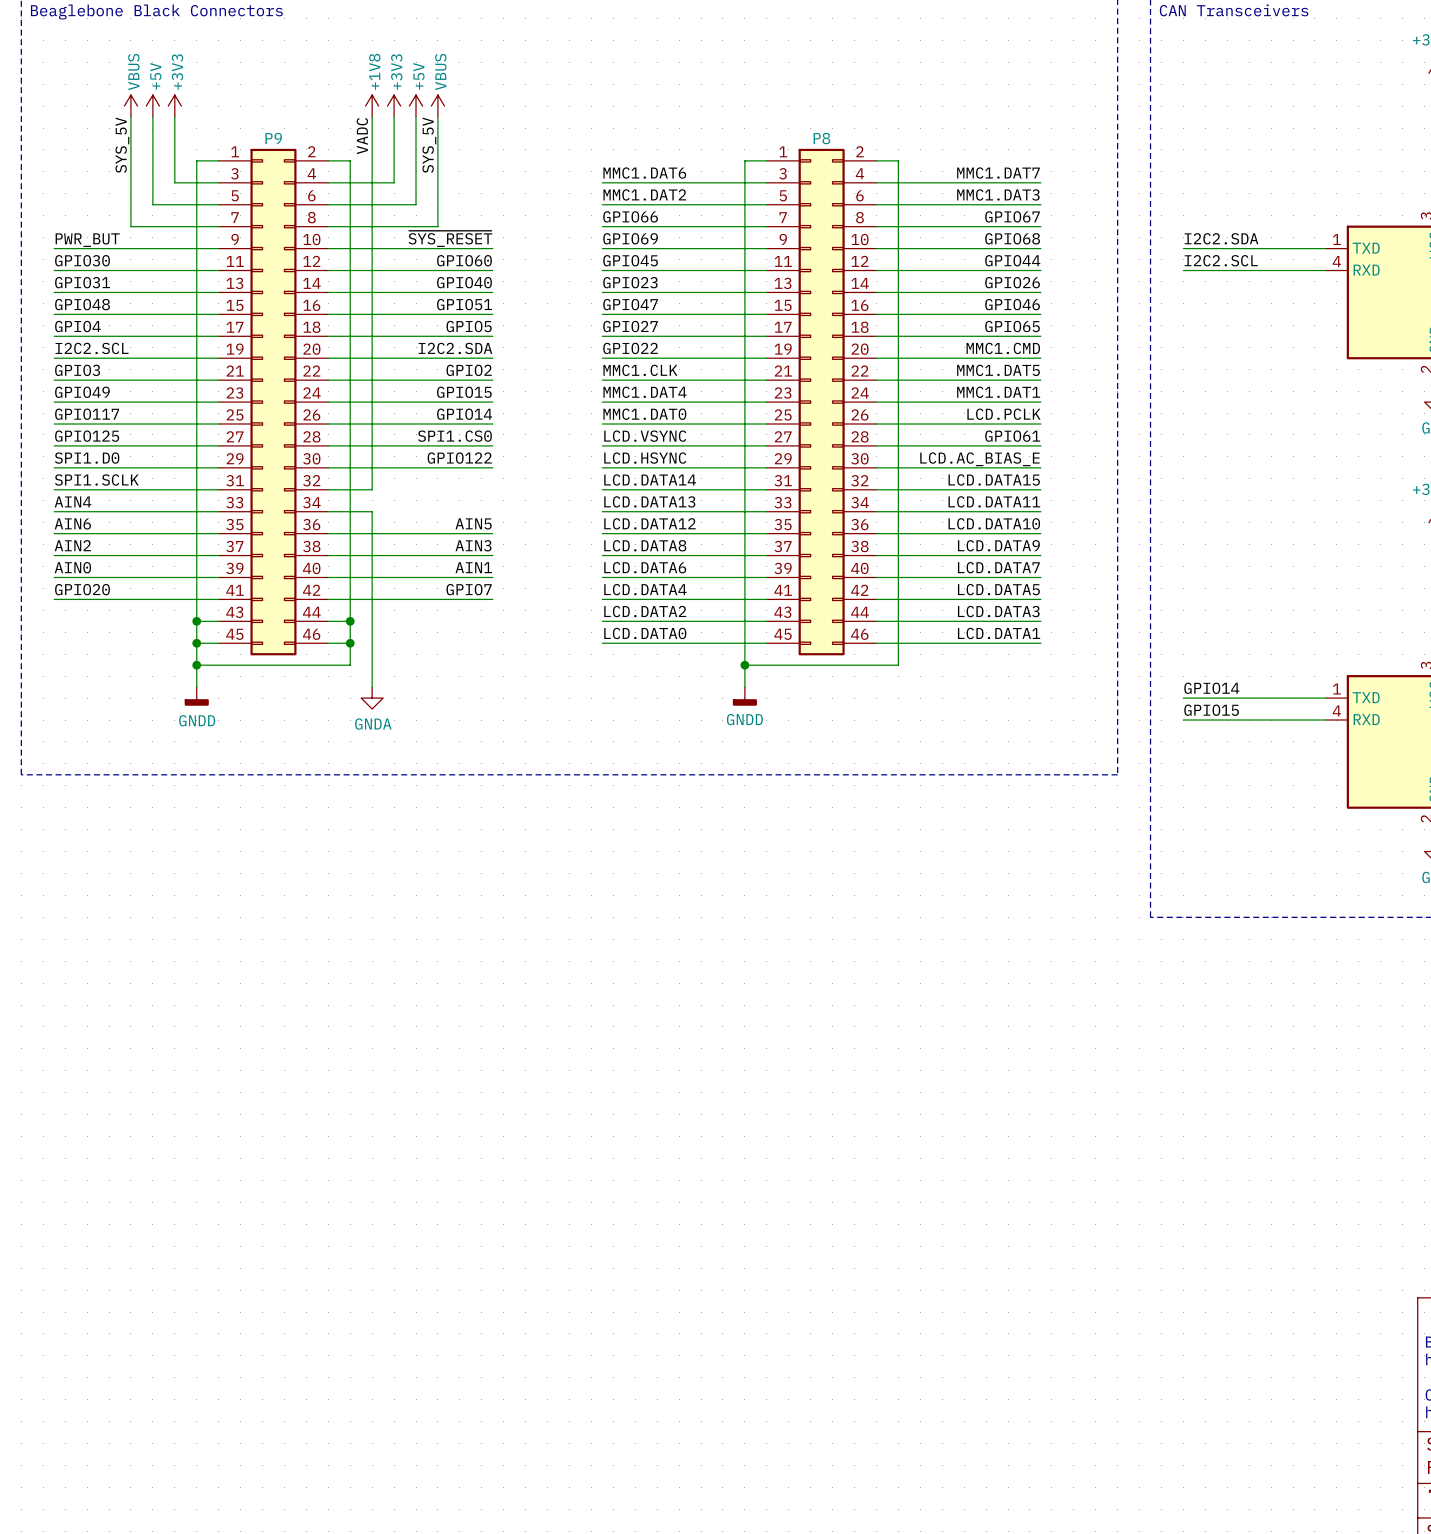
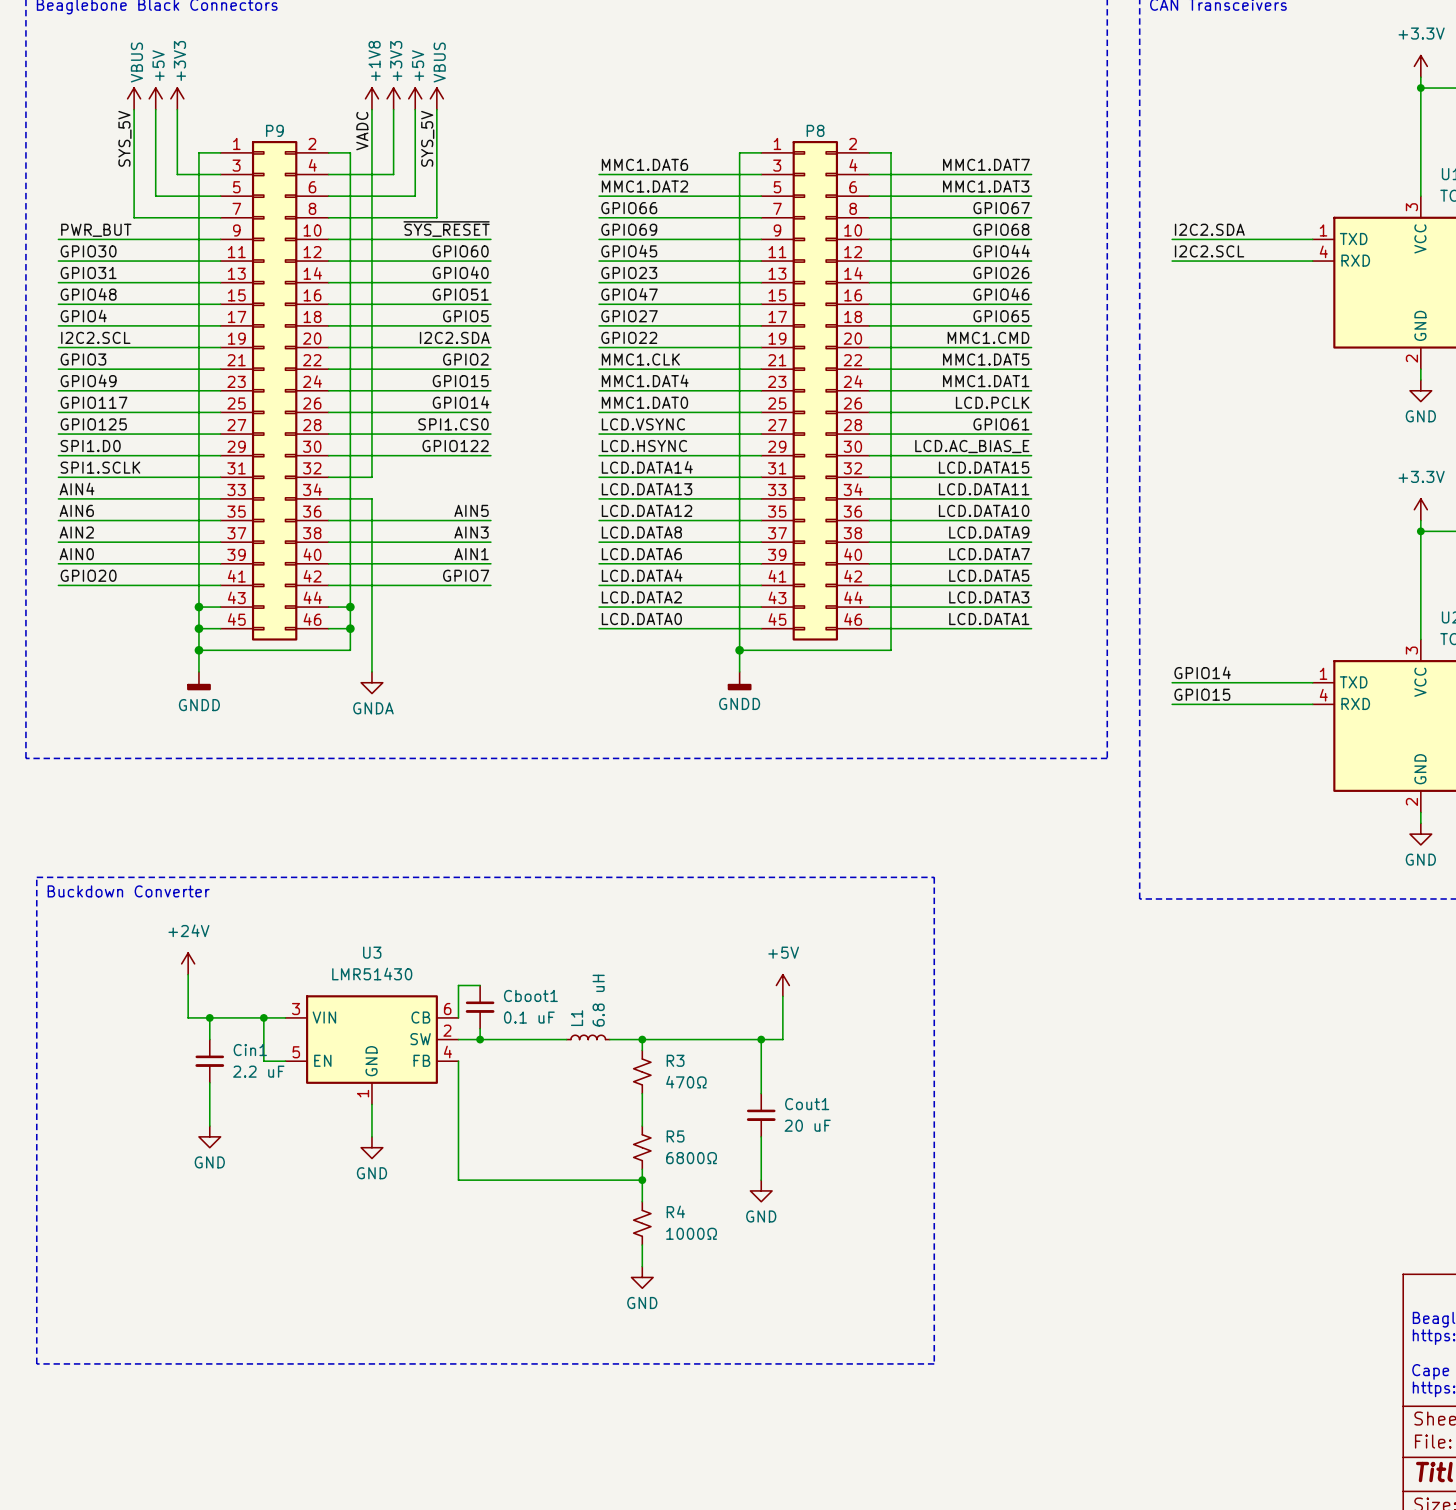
line: none -> (36, 877) (934, 877) (934, 1363) (36, 1363) (36, 877)
text: none -> Buckdown Converter (128, 891)
power symbol: none -> +24V (188, 963)
wire: none -> (188, 974) (188, 1017) (285, 1017)
wire: none -> (480, 985) (458, 985) (458, 1017)
power symbol: none -> +5V (782, 985)
wire: none -> (782, 996) (782, 1039) (609, 1039)
Cboot1: none -> 0.1 uF (480, 1007)
wire: none -> (209, 1017) (209, 1039)
junction: none -> (209, 1017)
wire: none -> (263, 1017) (263, 1061) (285, 1061)
junction: none -> (263, 1017)
wire: none -> (480, 1028) (480, 1039)
L1: none -> 6.8 uH (588, 1037)
wire: none -> (458, 1039) (566, 1039)
junction: none -> (480, 1039)
wire: none -> (642, 1039) (642, 1050)
junction: none -> (642, 1039)
wire: none -> (761, 1039) (761, 1093)
junction: none -> (761, 1039)
U3: none -> LMR51430 (371, 1049)
Cin1: none -> 2.2 uF (209, 1061)
wire: none -> (458, 1061) (458, 1180) (642, 1180)
R3: none -> 470Ω (642, 1072)
wire: none -> (209, 1082) (209, 1126)
wire: none -> (642, 1093) (642, 1126)
wire: none -> (371, 1104) (371, 1136)
Cout1: none -> 20 uF (761, 1115)
power symbol: none -> GND (209, 1136)
wire: none -> (761, 1136) (761, 1180)
power symbol: none -> GND (371, 1147)
R5: none -> 6800Ω (642, 1147)
wire: none -> (642, 1169) (642, 1201)
junction: none -> (642, 1180)
power symbol: none -> GND (761, 1190)
R4: none -> 1000Ω (642, 1223)
wire: none -> (642, 1245) (642, 1266)
power symbol: none -> GND (642, 1277)

